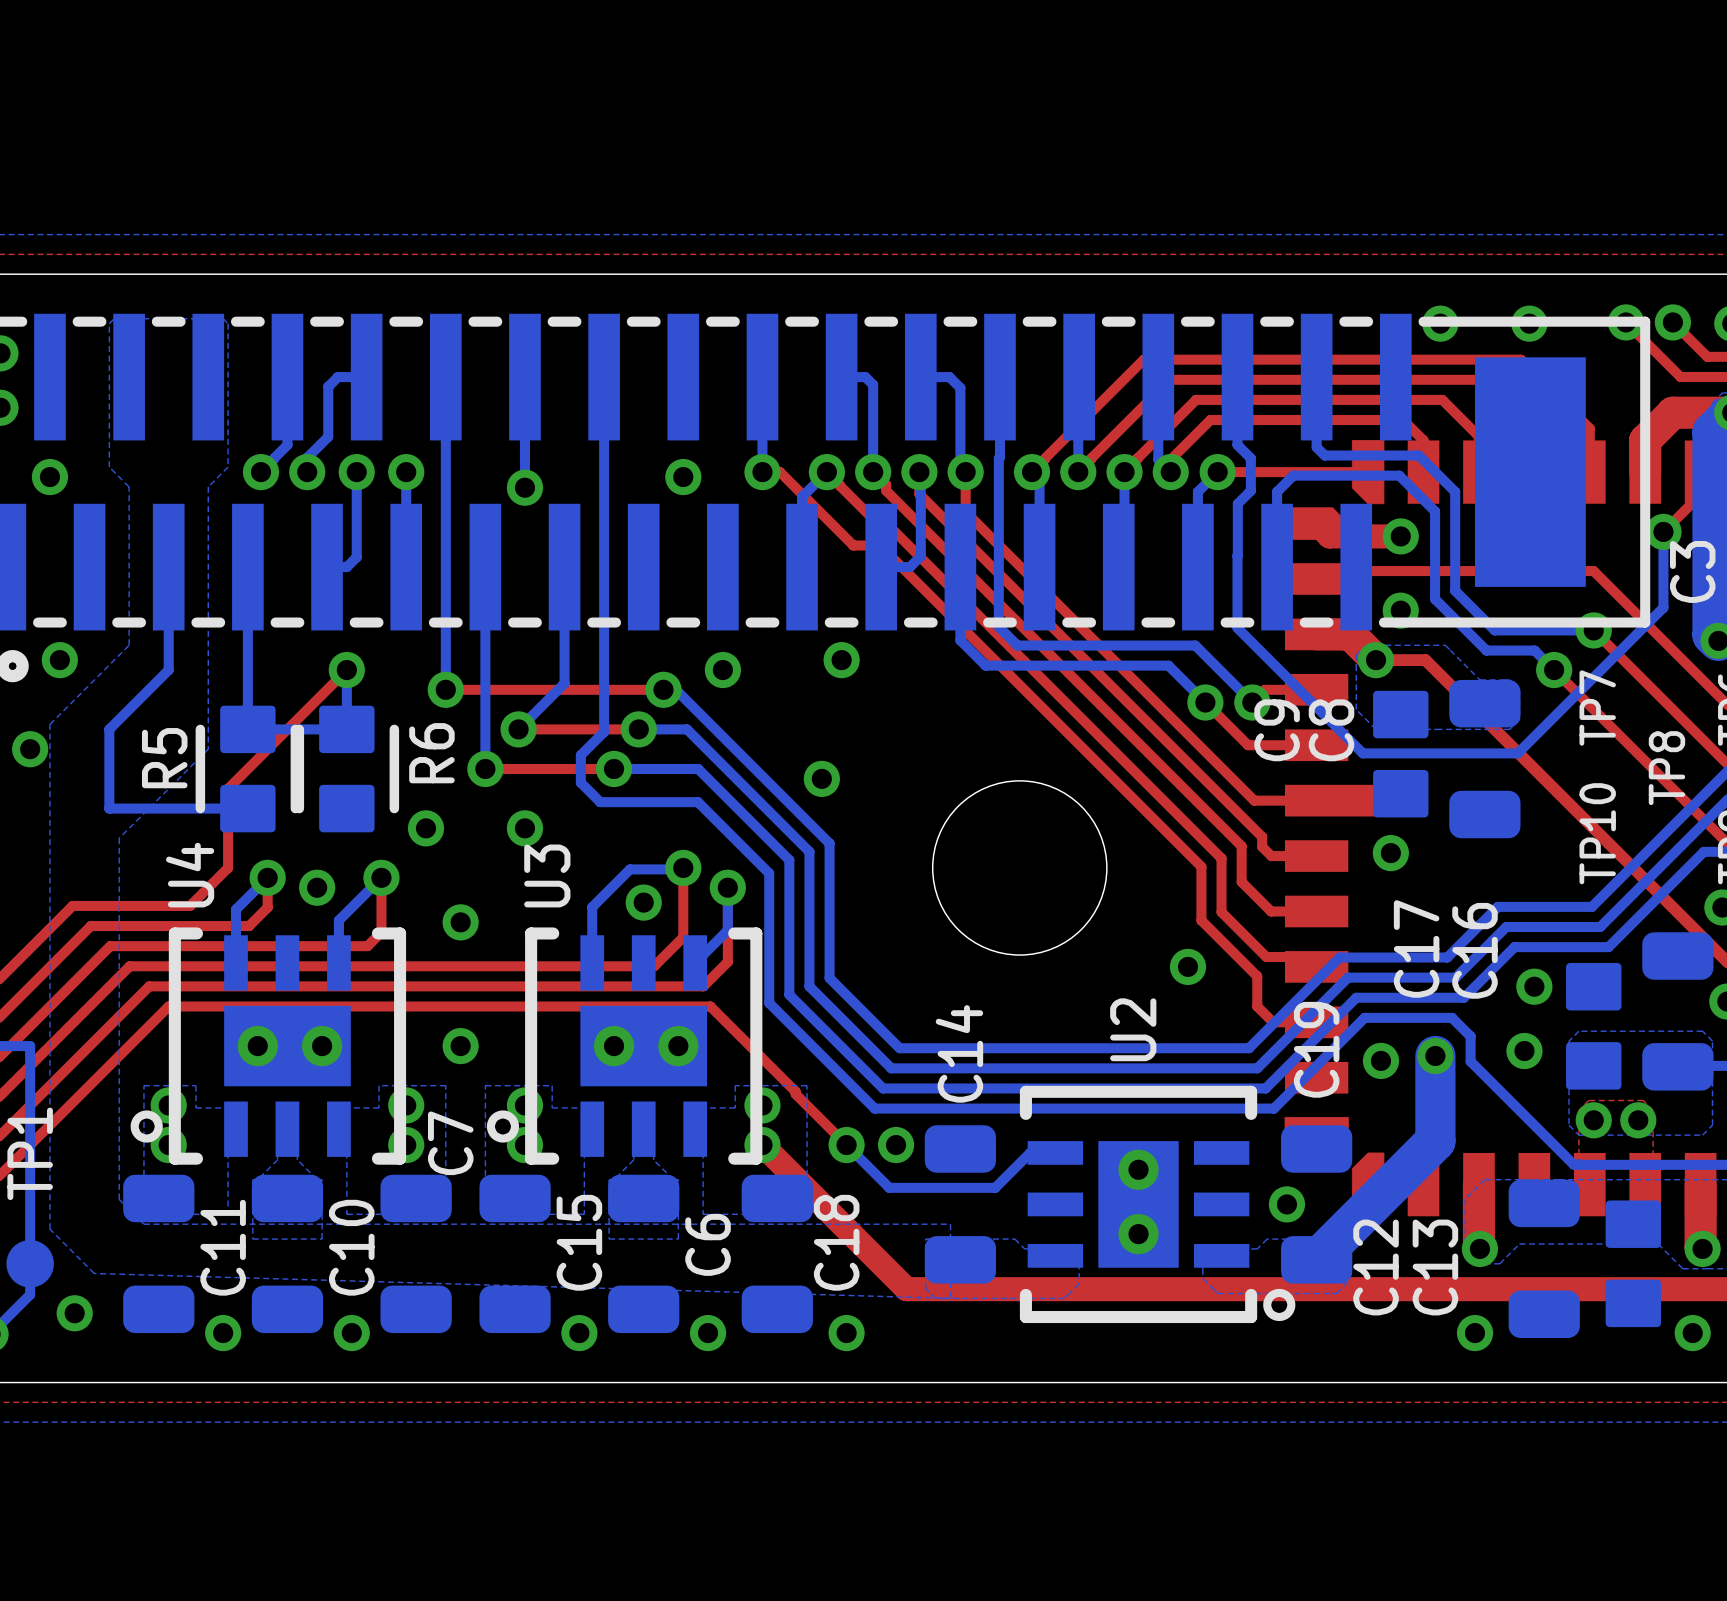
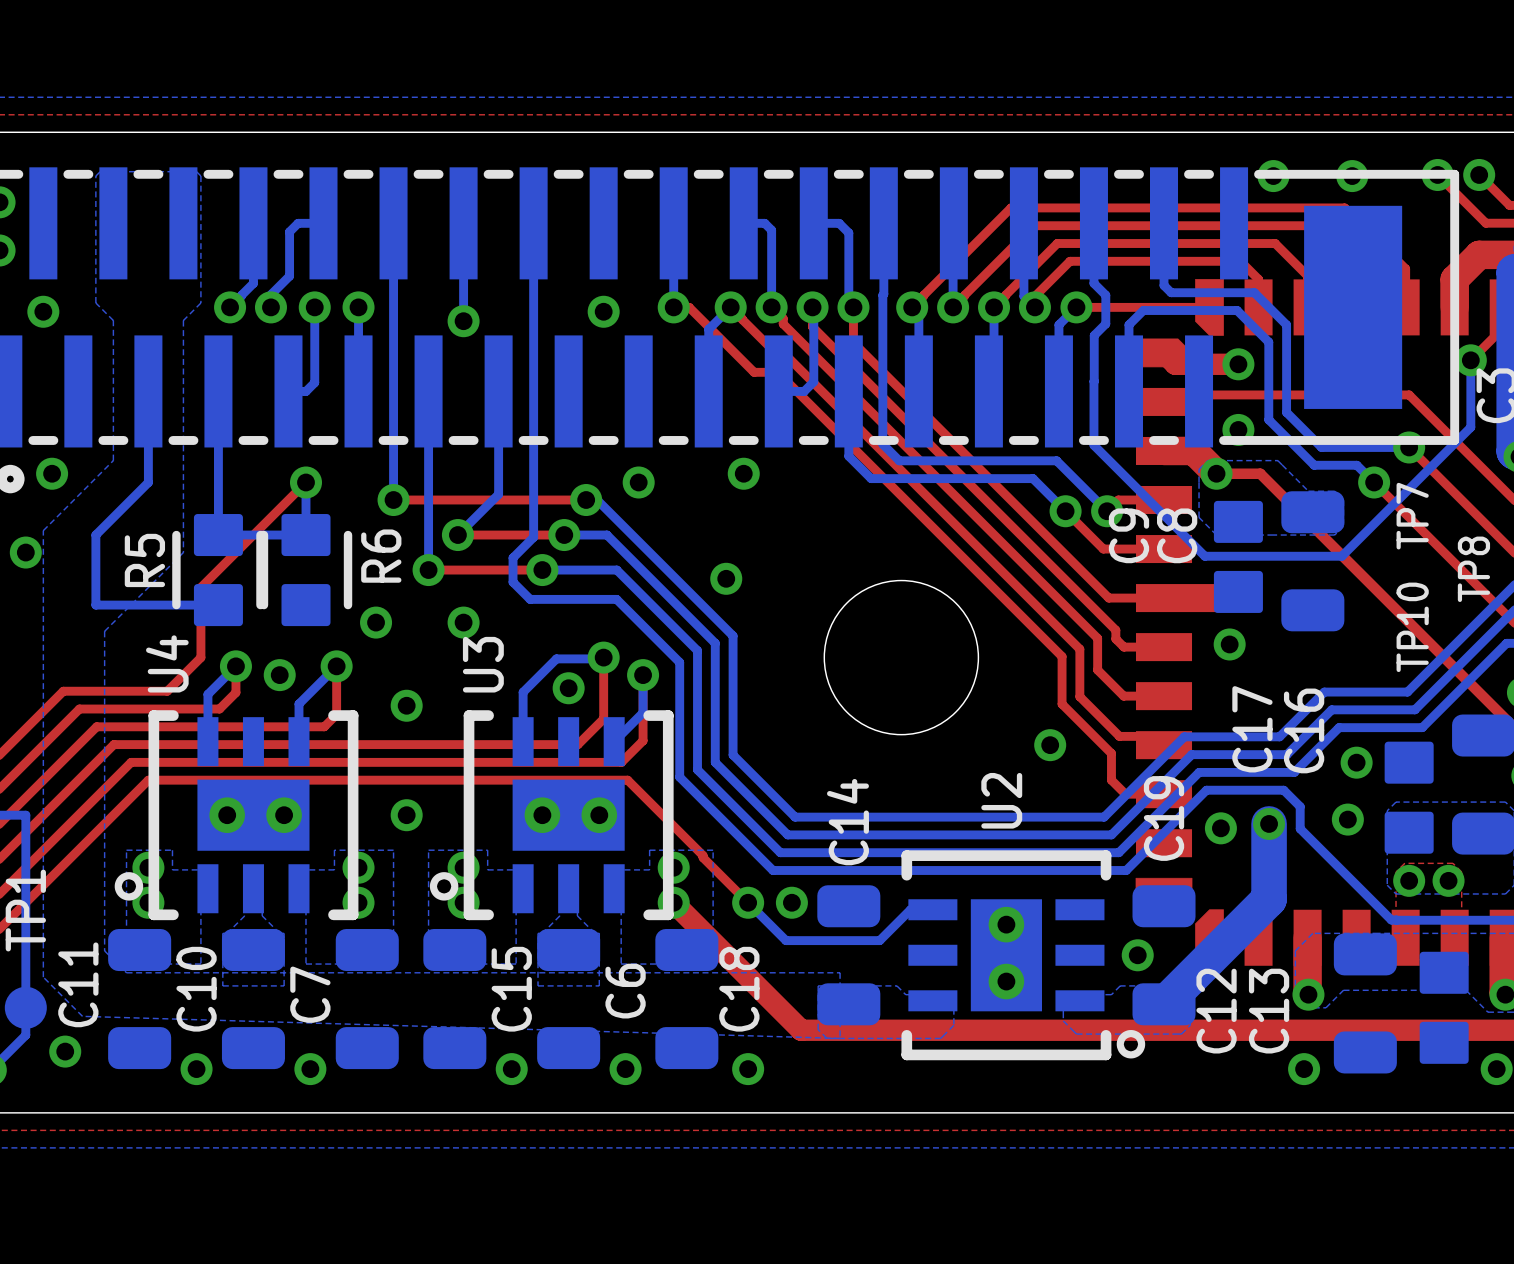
C7 name position: C7 (450, 1143) -> C7 (310, 994)
C11 name position: C11 (223, 1247) -> C11 (78, 984)
C10 name position: C10 (351, 1247) -> C10 (196, 989)

